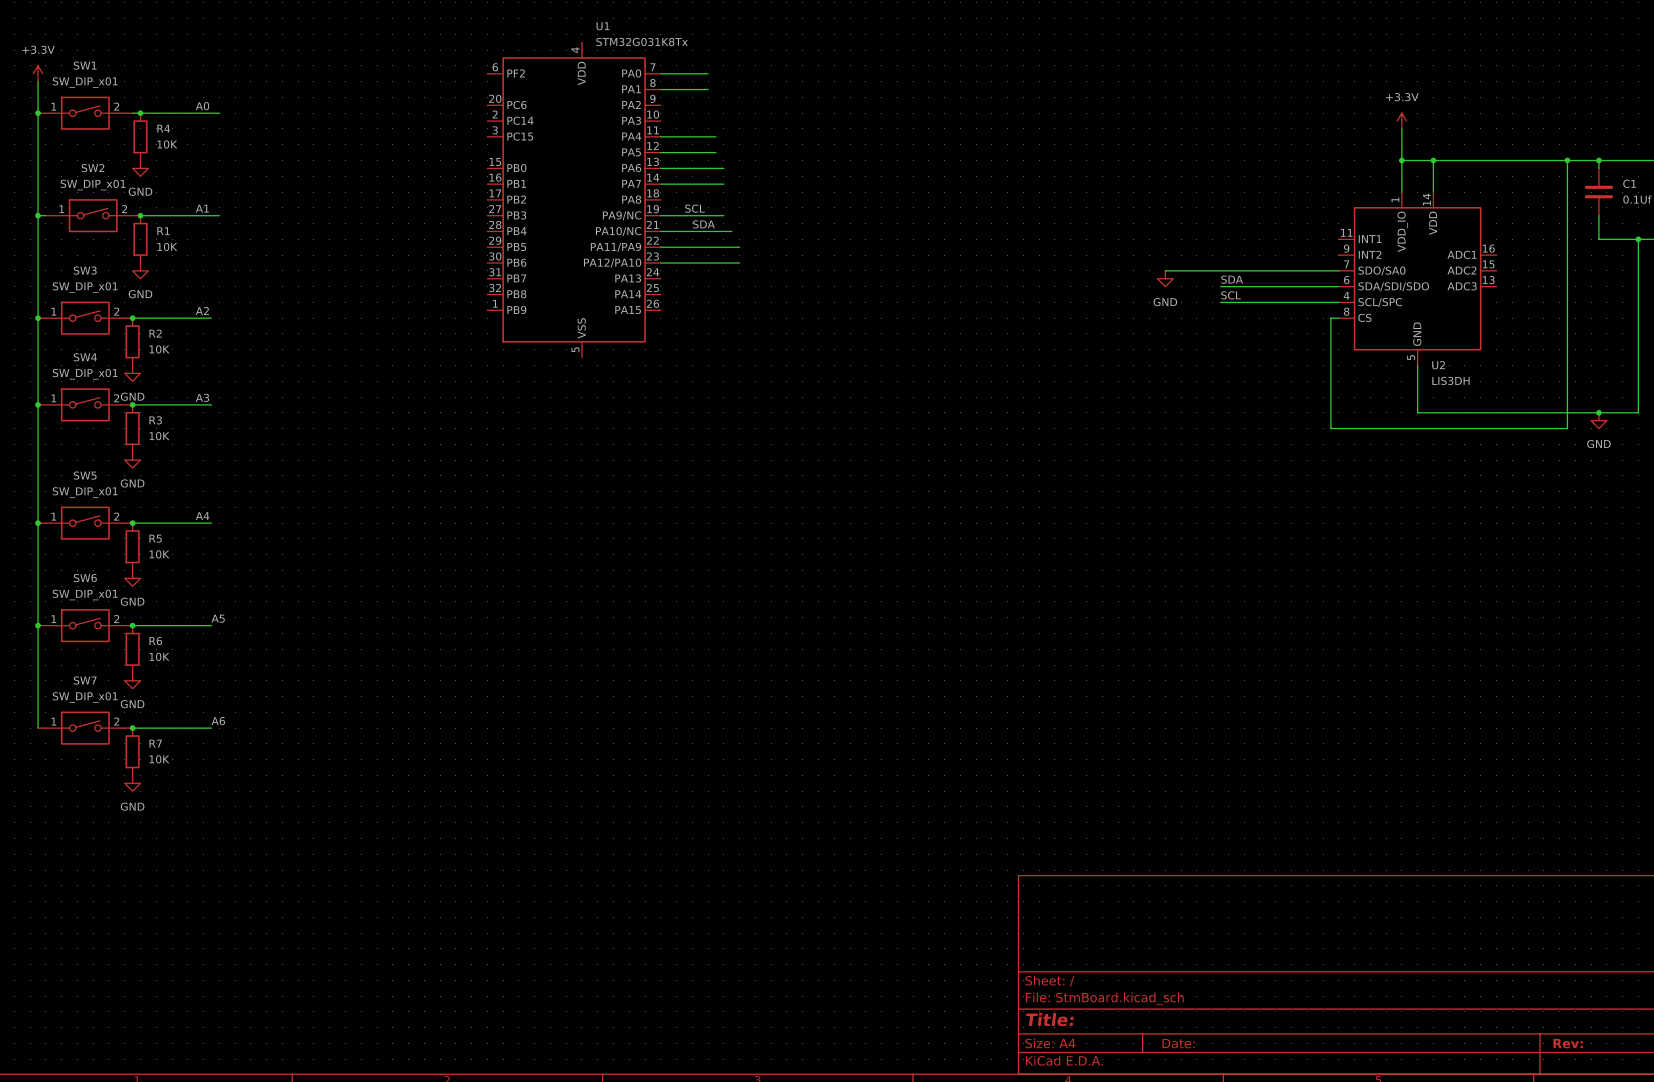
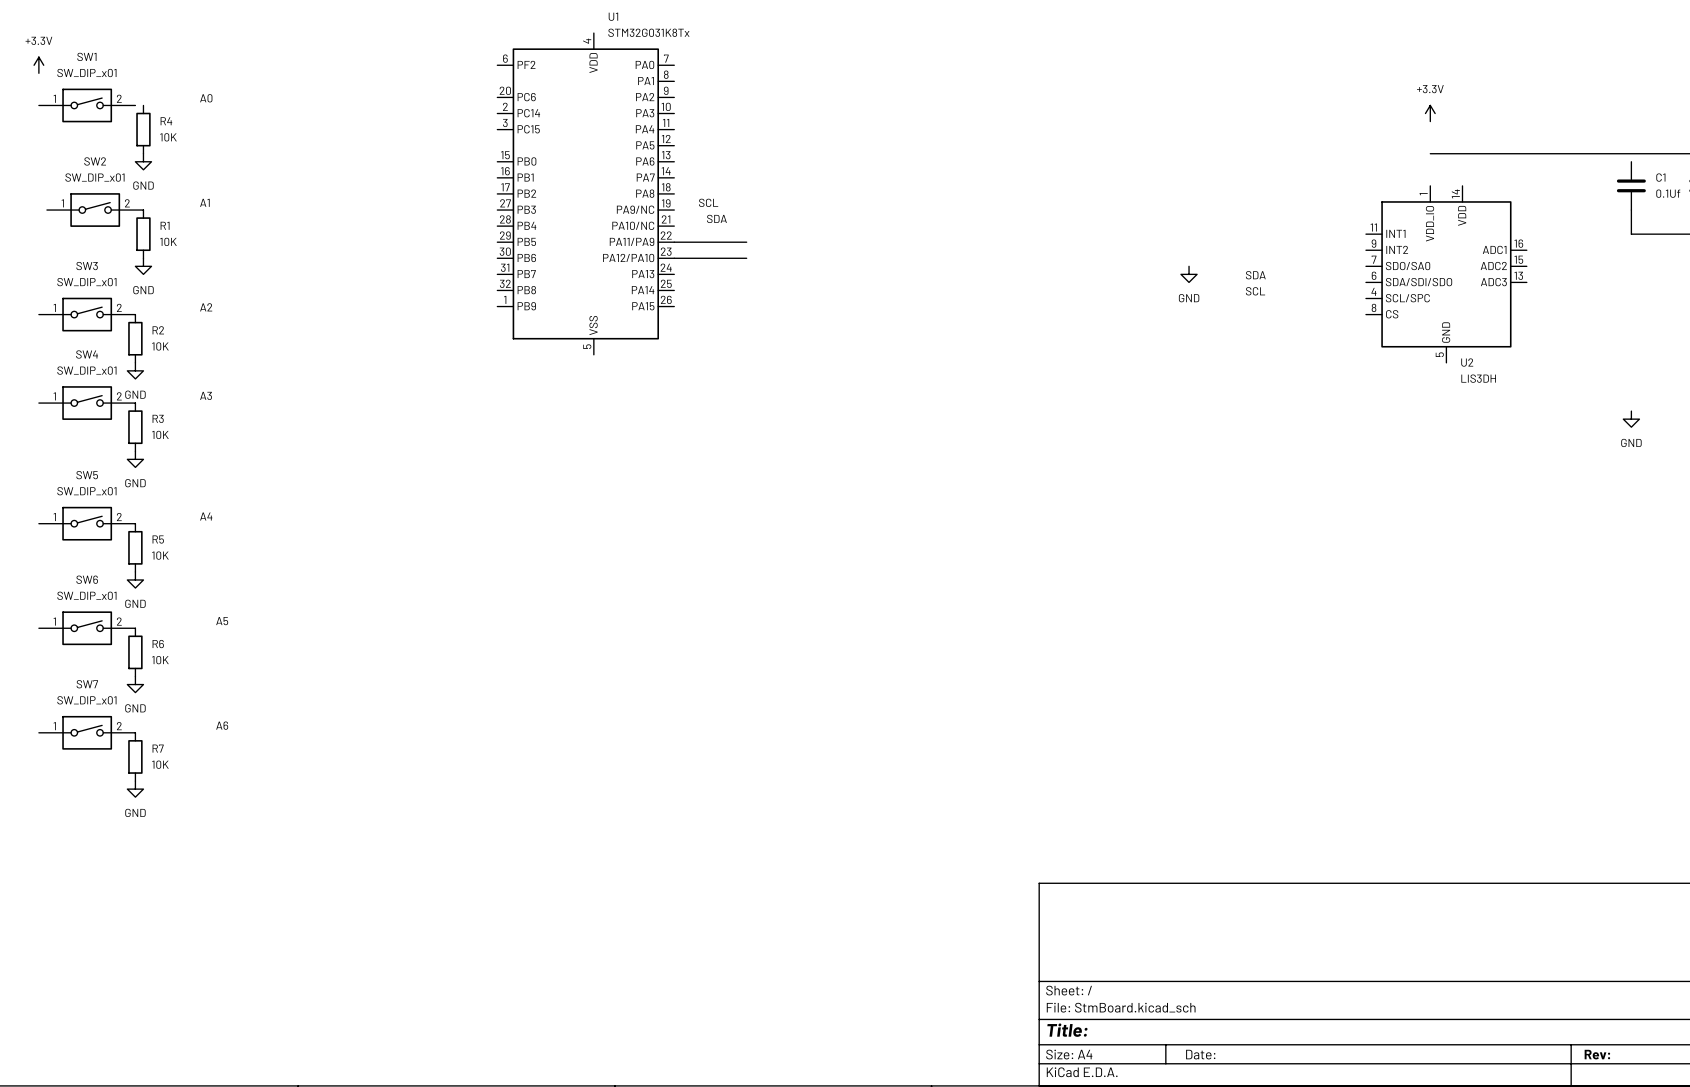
wire: (660, 73) (708, 73) -> none
wire: (38, 81) (38, 728) -> none
wire: (660, 89) (708, 89) -> none
junction: (38, 113) -> none
wire: (132, 113) (219, 113) -> none
junction: (140, 113) -> none
wire: (1401, 128) (1401, 192) -> none
wire: (660, 136) (716, 136) -> none
wire: (660, 152) (716, 152) -> none
junction: (1401, 160) -> none
wire: (1433, 160) (1433, 192) -> none
junction: (1433, 160) -> none
wire: (1567, 160) (1567, 428) (1330, 428) (1330, 318) (1338, 318) -> none
junction: (1567, 160) -> none
wire: (1598, 160) (1598, 168) -> none
junction: (1598, 160) -> none
wire: (660, 168) (723, 168) -> none
wire: (660, 184) (723, 184) -> none
wire: (38, 215) (45, 215) -> none
junction: (38, 215) -> none
wire: (140, 215) (219, 215) -> none
junction: (140, 215) -> none
wire: (660, 215) (723, 215) -> none
wire: (660, 231) (731, 231) -> none
wire: (1638, 239) (1638, 412) (1417, 412) (1417, 365) -> none
junction: (1638, 239) -> none
wire: (731, 247) (739, 247) -> none
wire: (731, 262) (739, 262) -> none
wire: (1165, 270) (1338, 270) -> none
wire: (1220, 286) (1338, 286) -> none
wire: (1220, 302) (1338, 302) -> none
junction: (38, 318) -> none
wire: (132, 318) (211, 318) -> none
junction: (132, 318) -> none
junction: (38, 404) -> none
wire: (132, 404) (211, 404) -> none
junction: (132, 404) -> none
junction: (1598, 412) -> none
junction: (38, 523) -> none
wire: (132, 523) (211, 523) -> none
junction: (132, 523) -> none
junction: (38, 625) -> none
wire: (132, 625) (211, 625) -> none
junction: (132, 625) -> none
wire: (132, 728) (211, 728) -> none
junction: (132, 728) -> none

